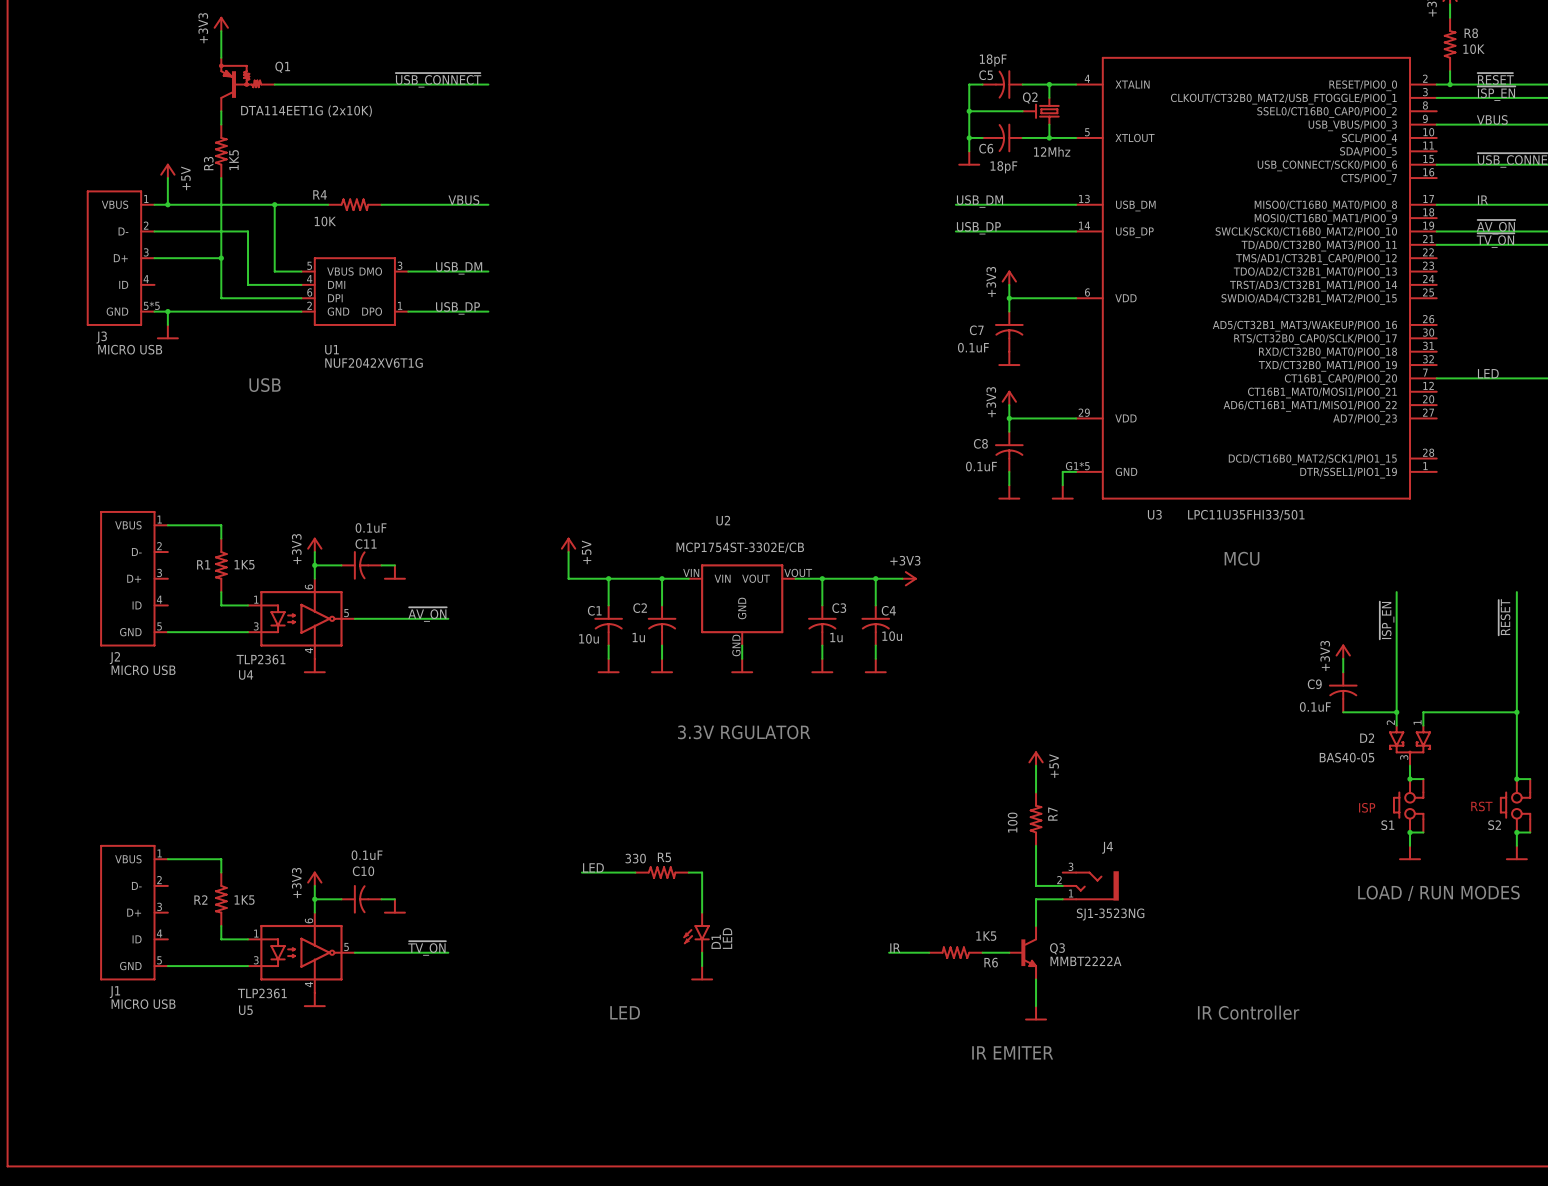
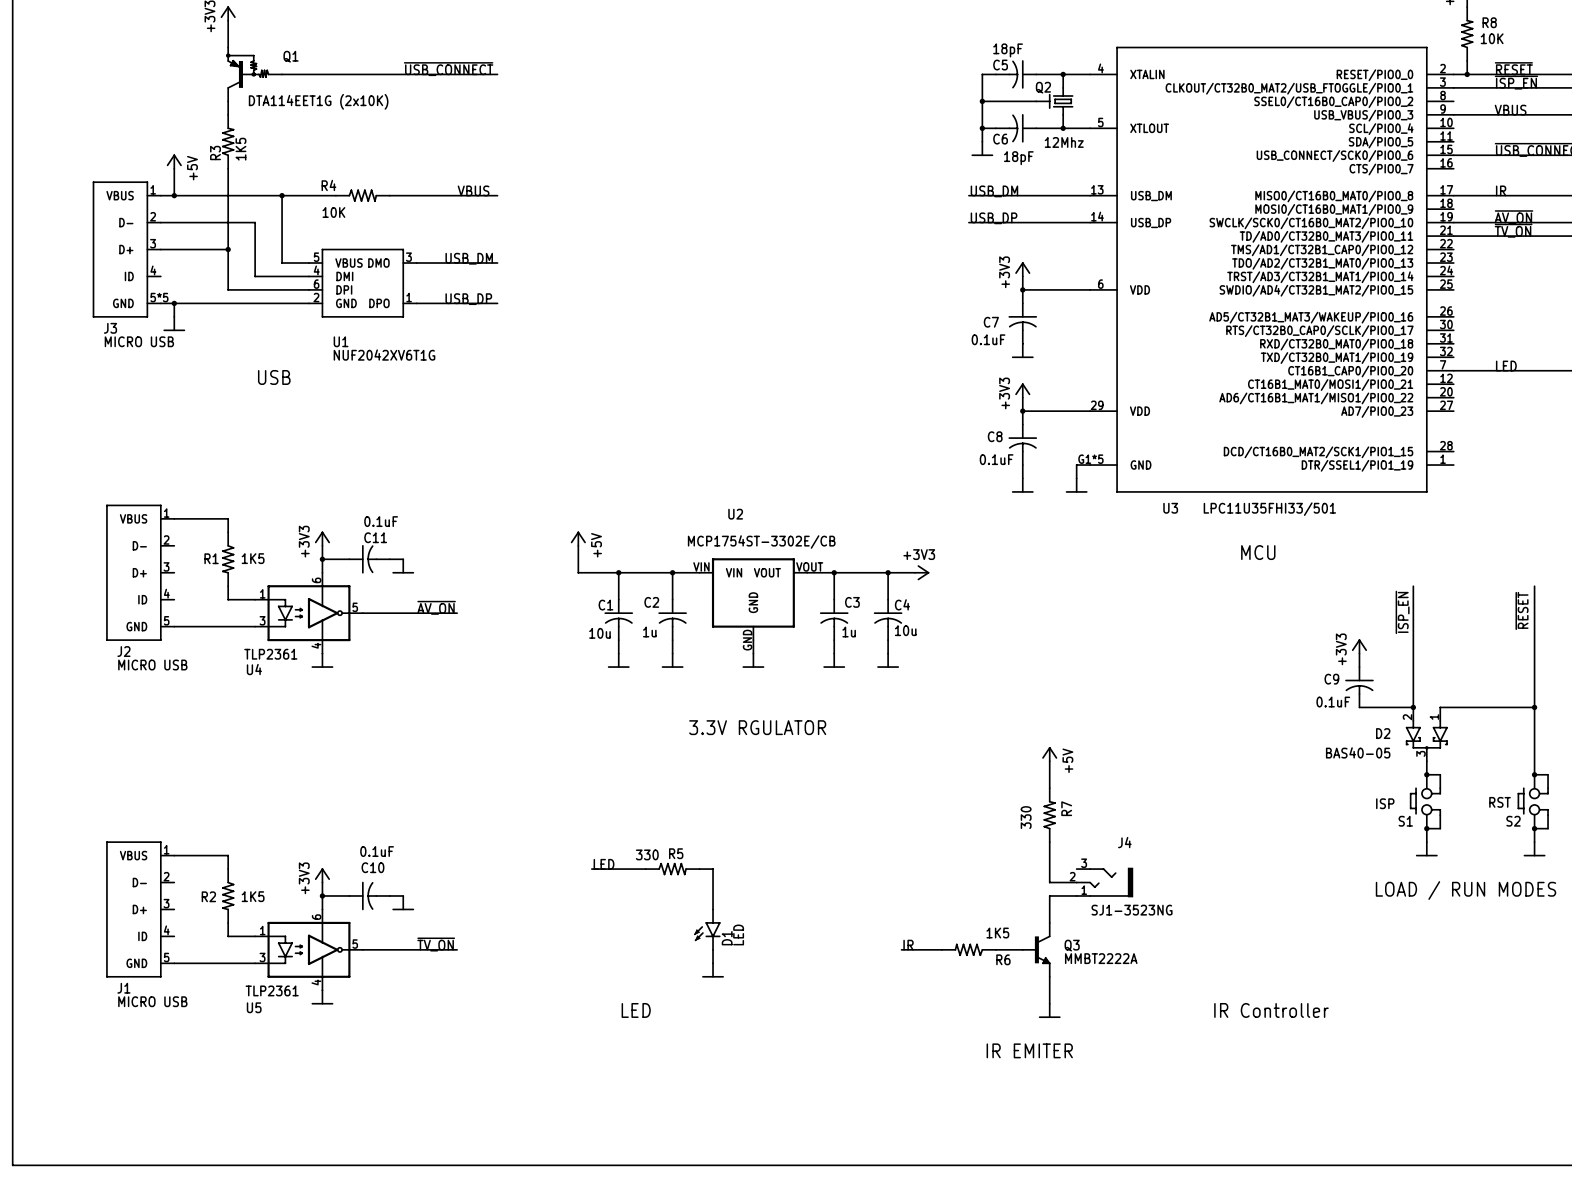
R7 value: 100 (1012, 822) -> 330 (1026, 817)

